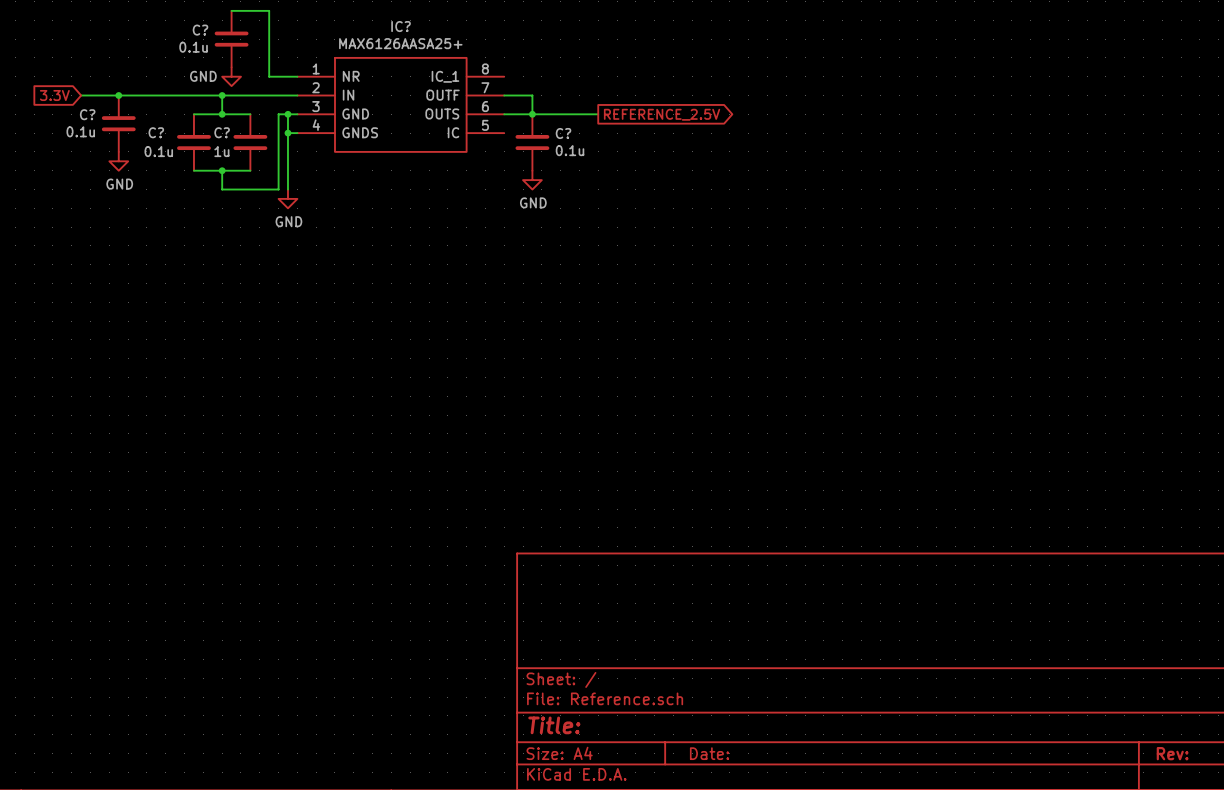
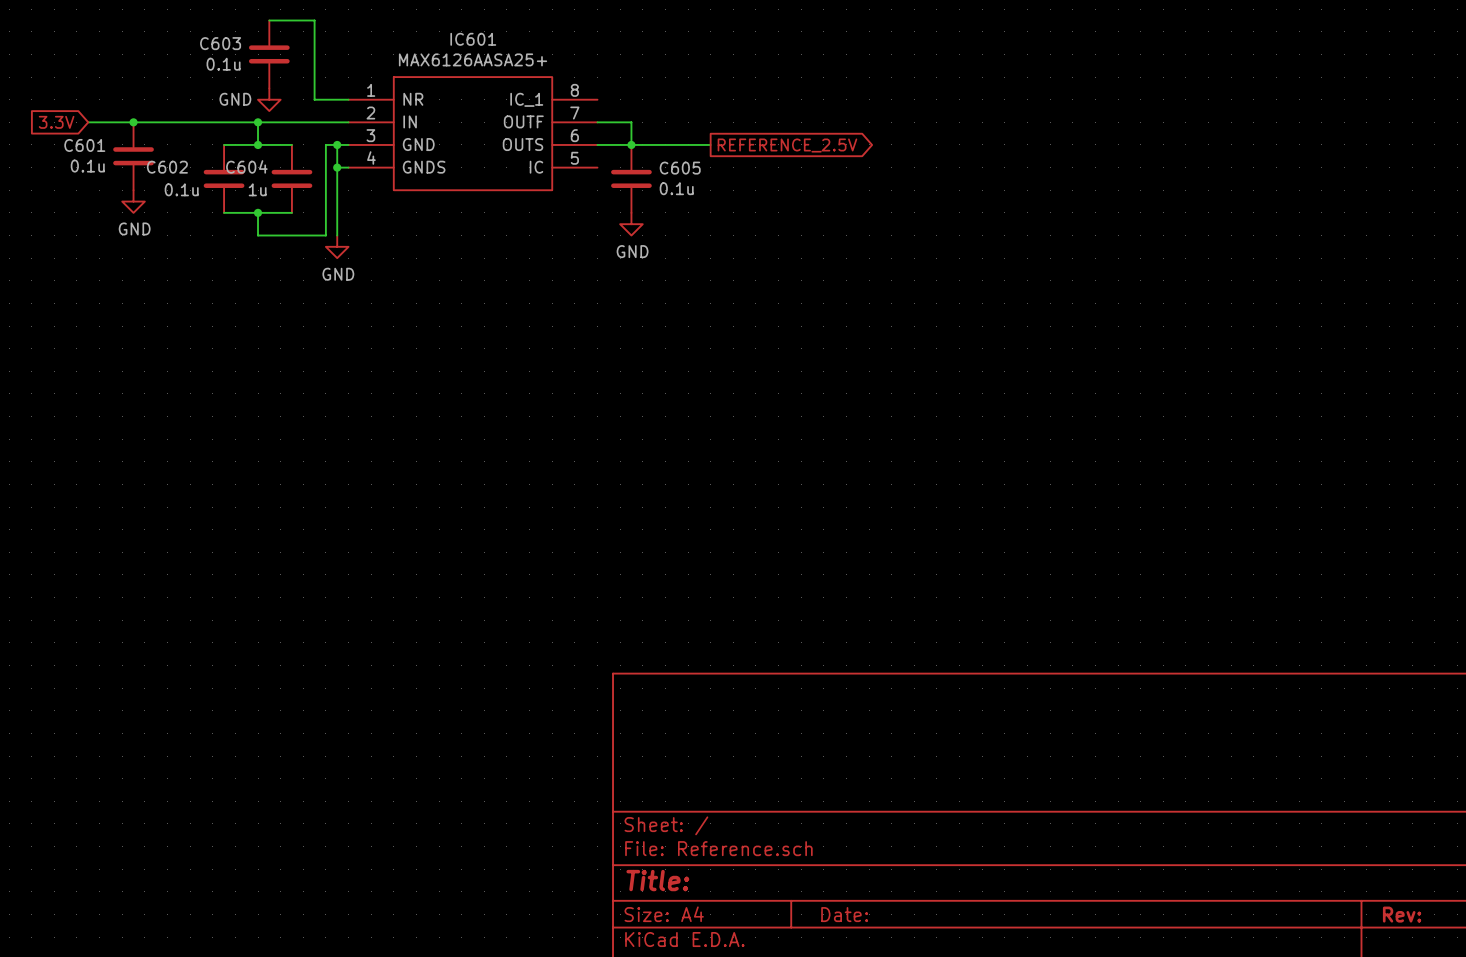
IC? name: IC? (401, 26) -> IC601 (473, 39)
C? name: C? (200, 30) -> C603 (220, 43)
C? name: C? (87, 114) -> C601 (84, 145)
C? name: C? (156, 132) -> C602 (167, 167)
C? name: C? (222, 132) -> C604 (246, 166)
C? name: C? (563, 133) -> C605 (680, 168)

